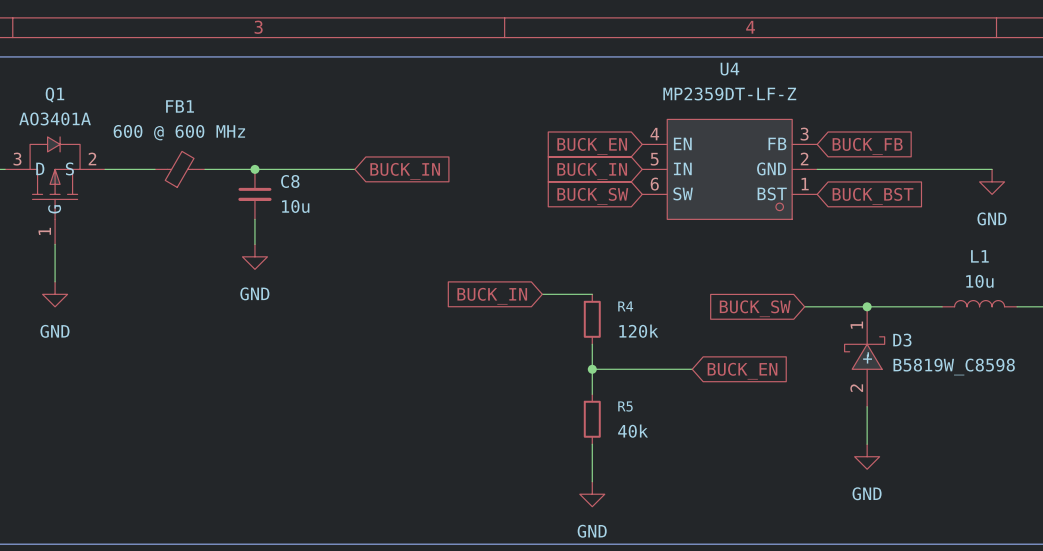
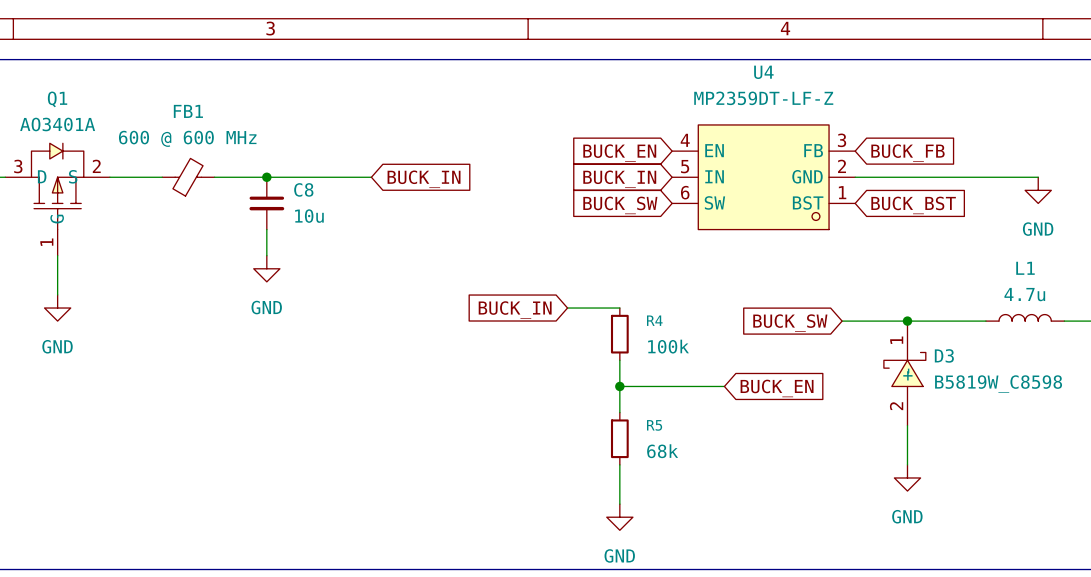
L1 value: 10u (979, 281) -> 4.7u (1024, 294)
R4 value: 120k (638, 331) -> 100k (668, 346)
R5 value: 40k (633, 431) -> 68k (662, 451)

